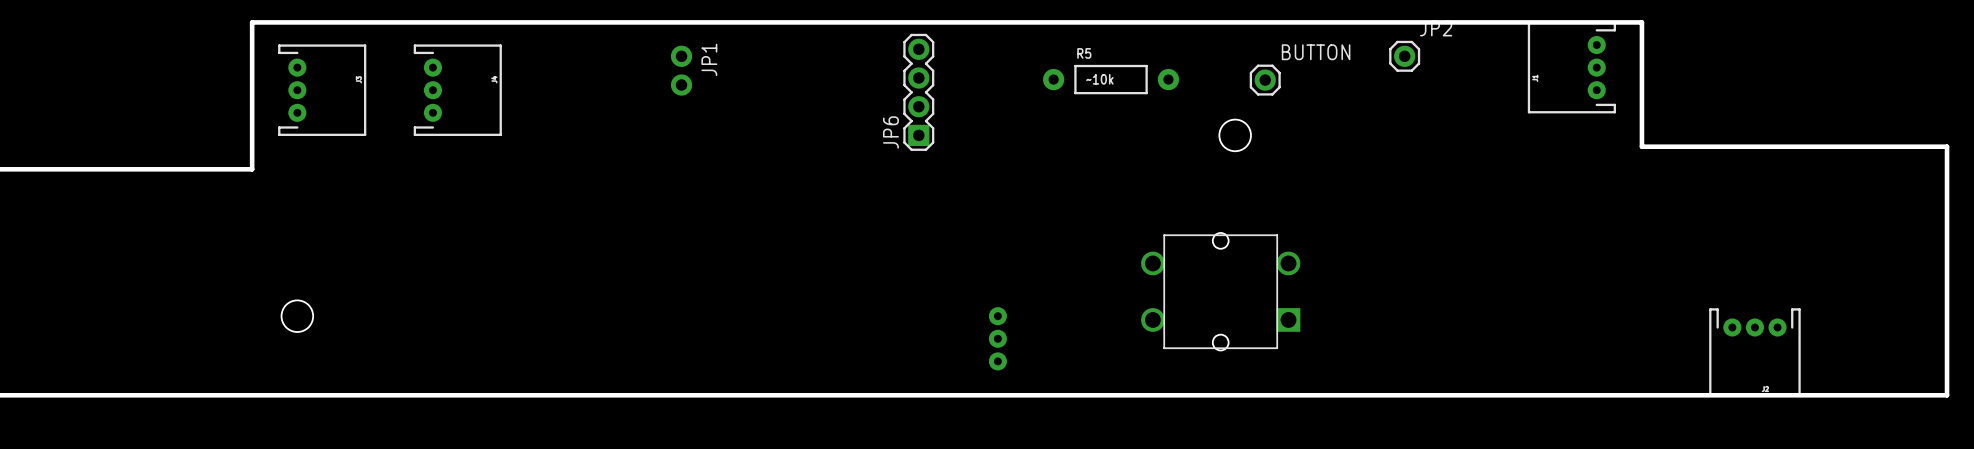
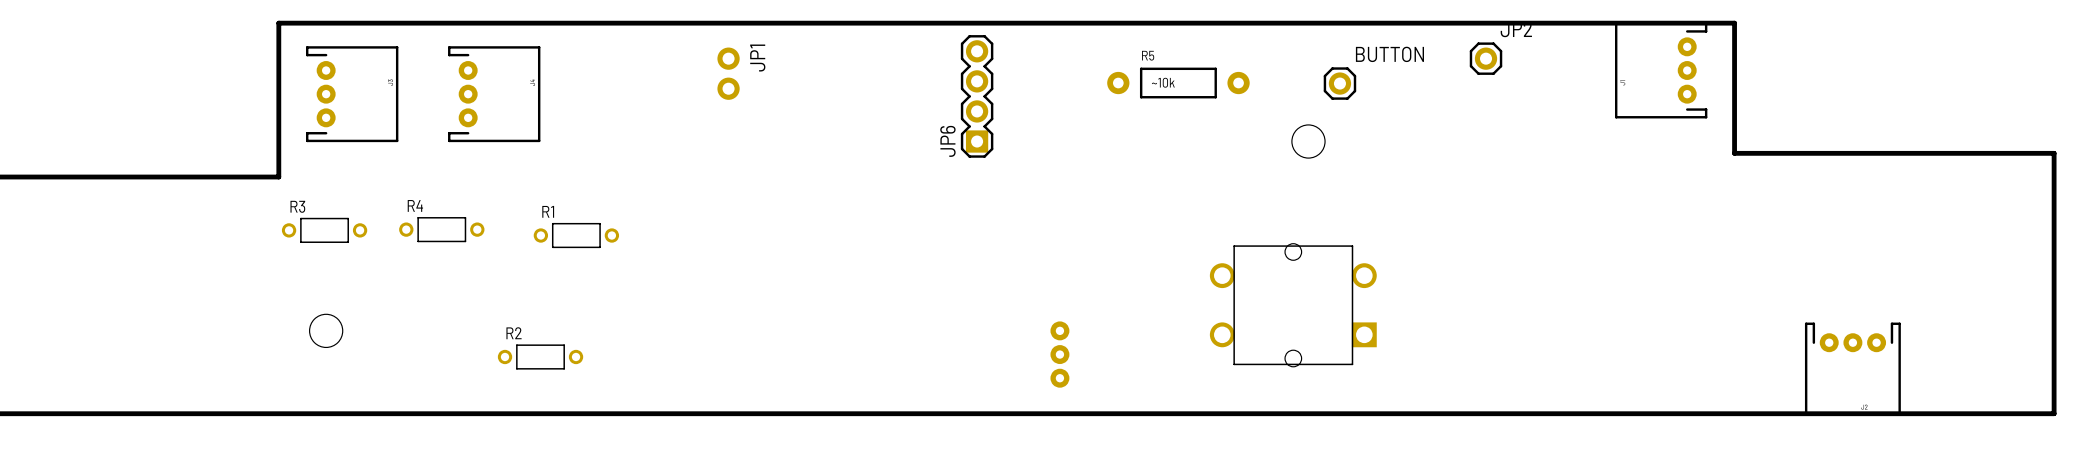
R4: none -> (441, 229)
R3: none -> (324, 230)
R1: none -> (576, 235)
R2: none -> (540, 356)

